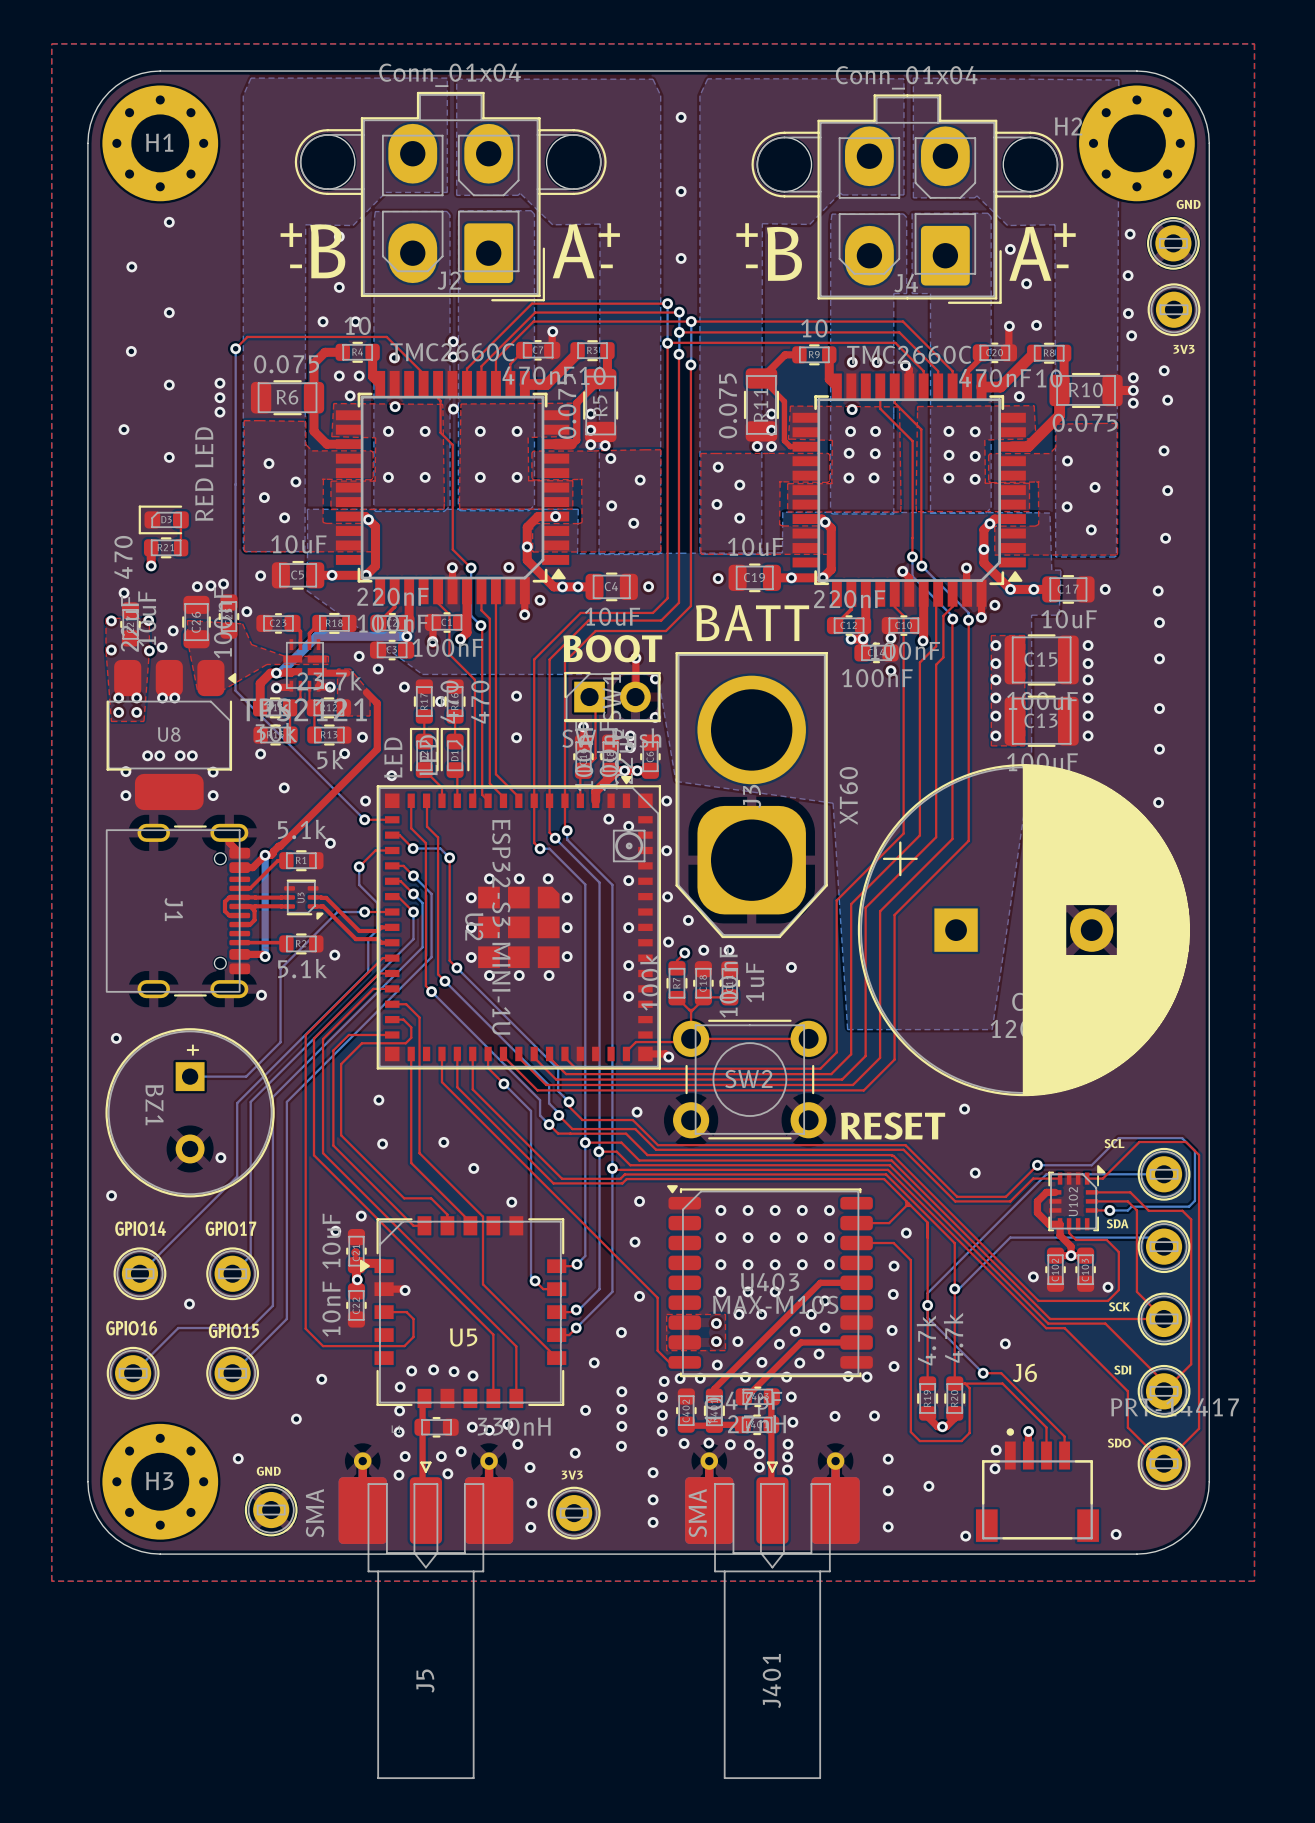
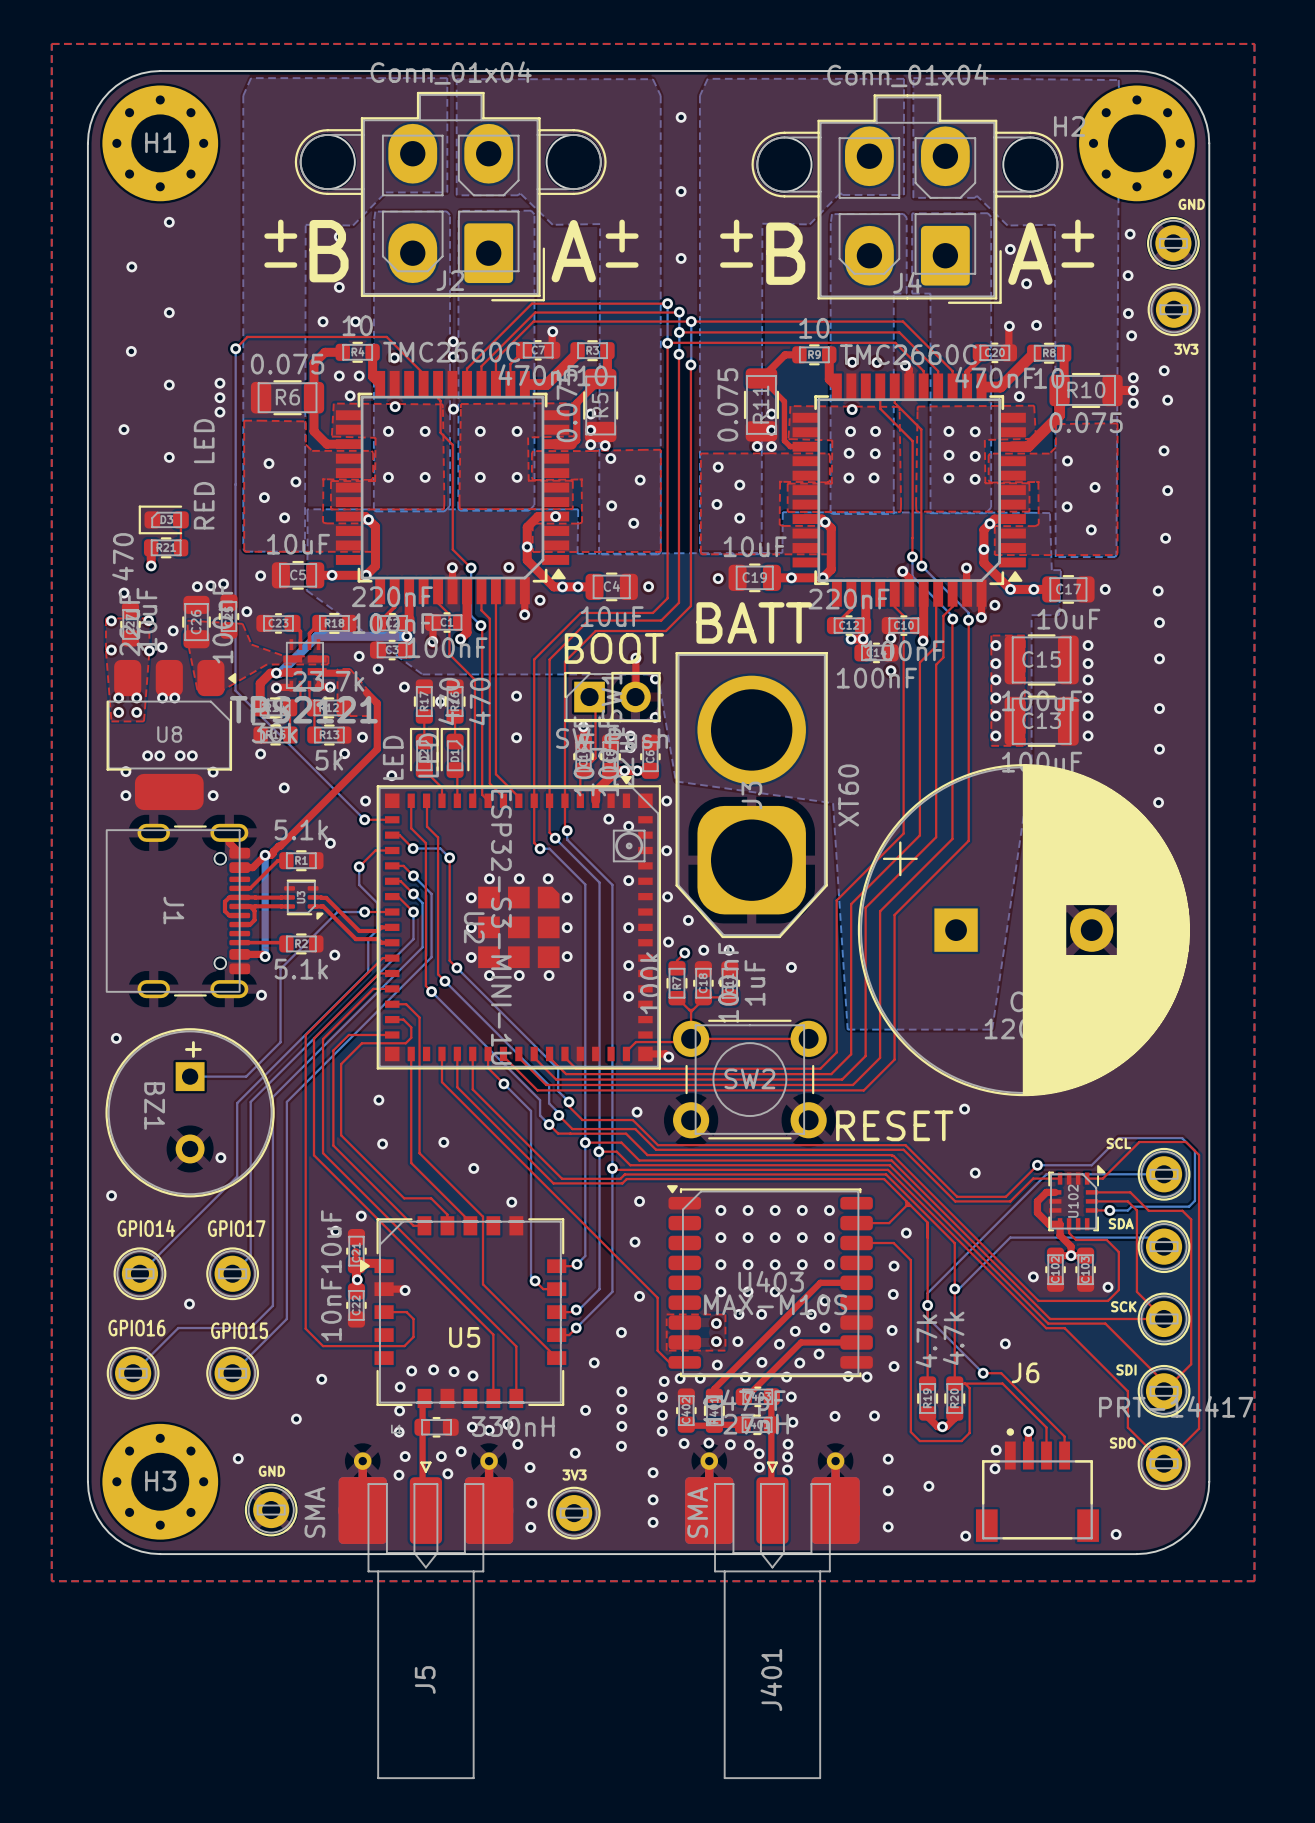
J5 footprint: [338, 1452, 514, 1780] -> [338, 1452, 514, 1780]
J401 footprint: [685, 1452, 860, 1780] -> [685, 1452, 860, 1780]

